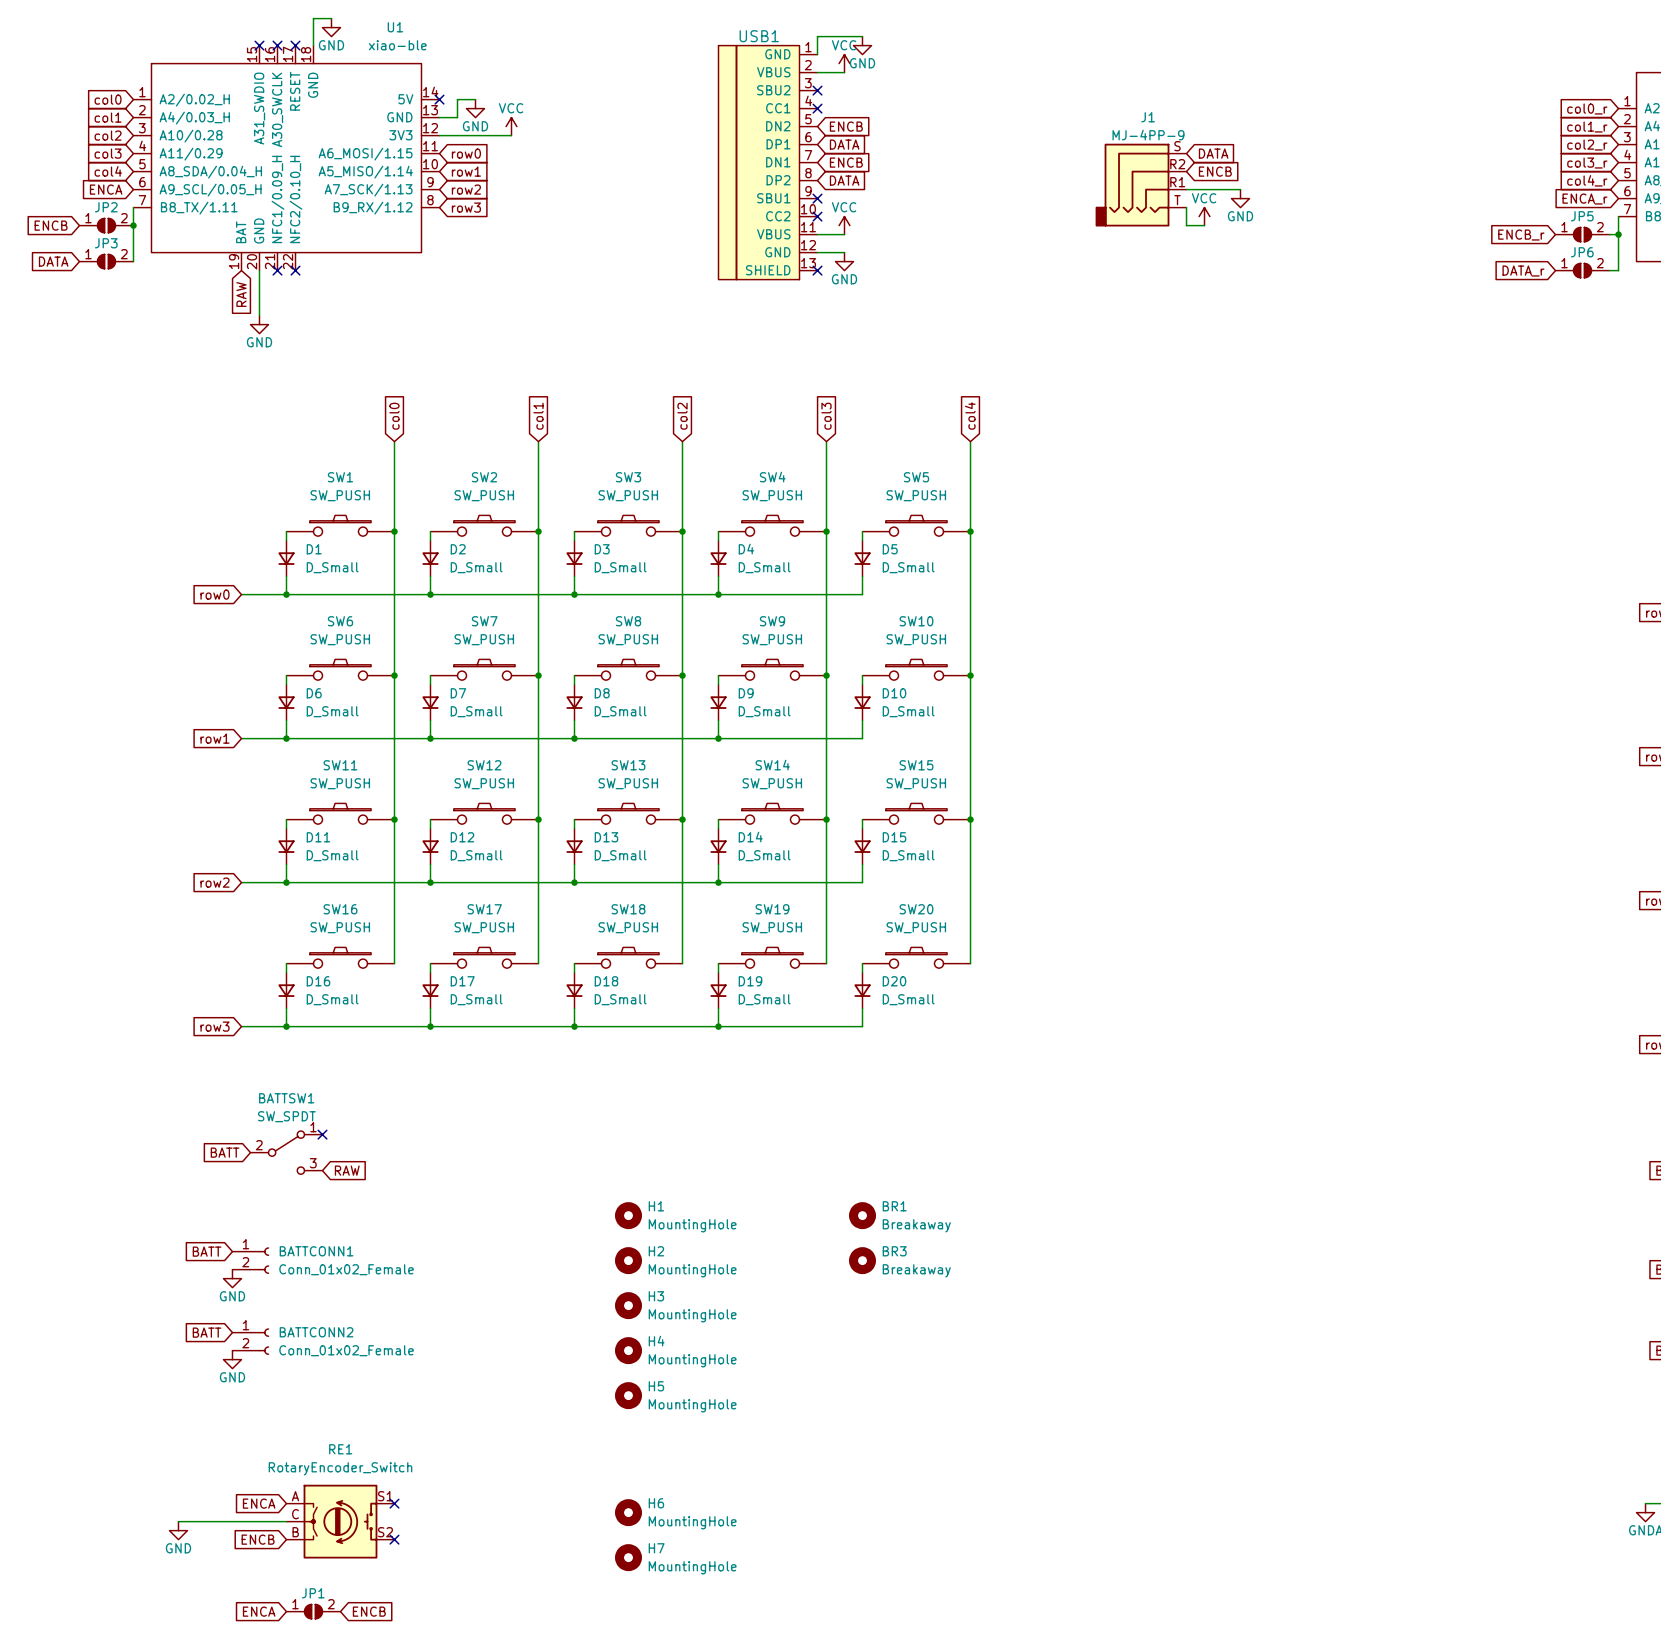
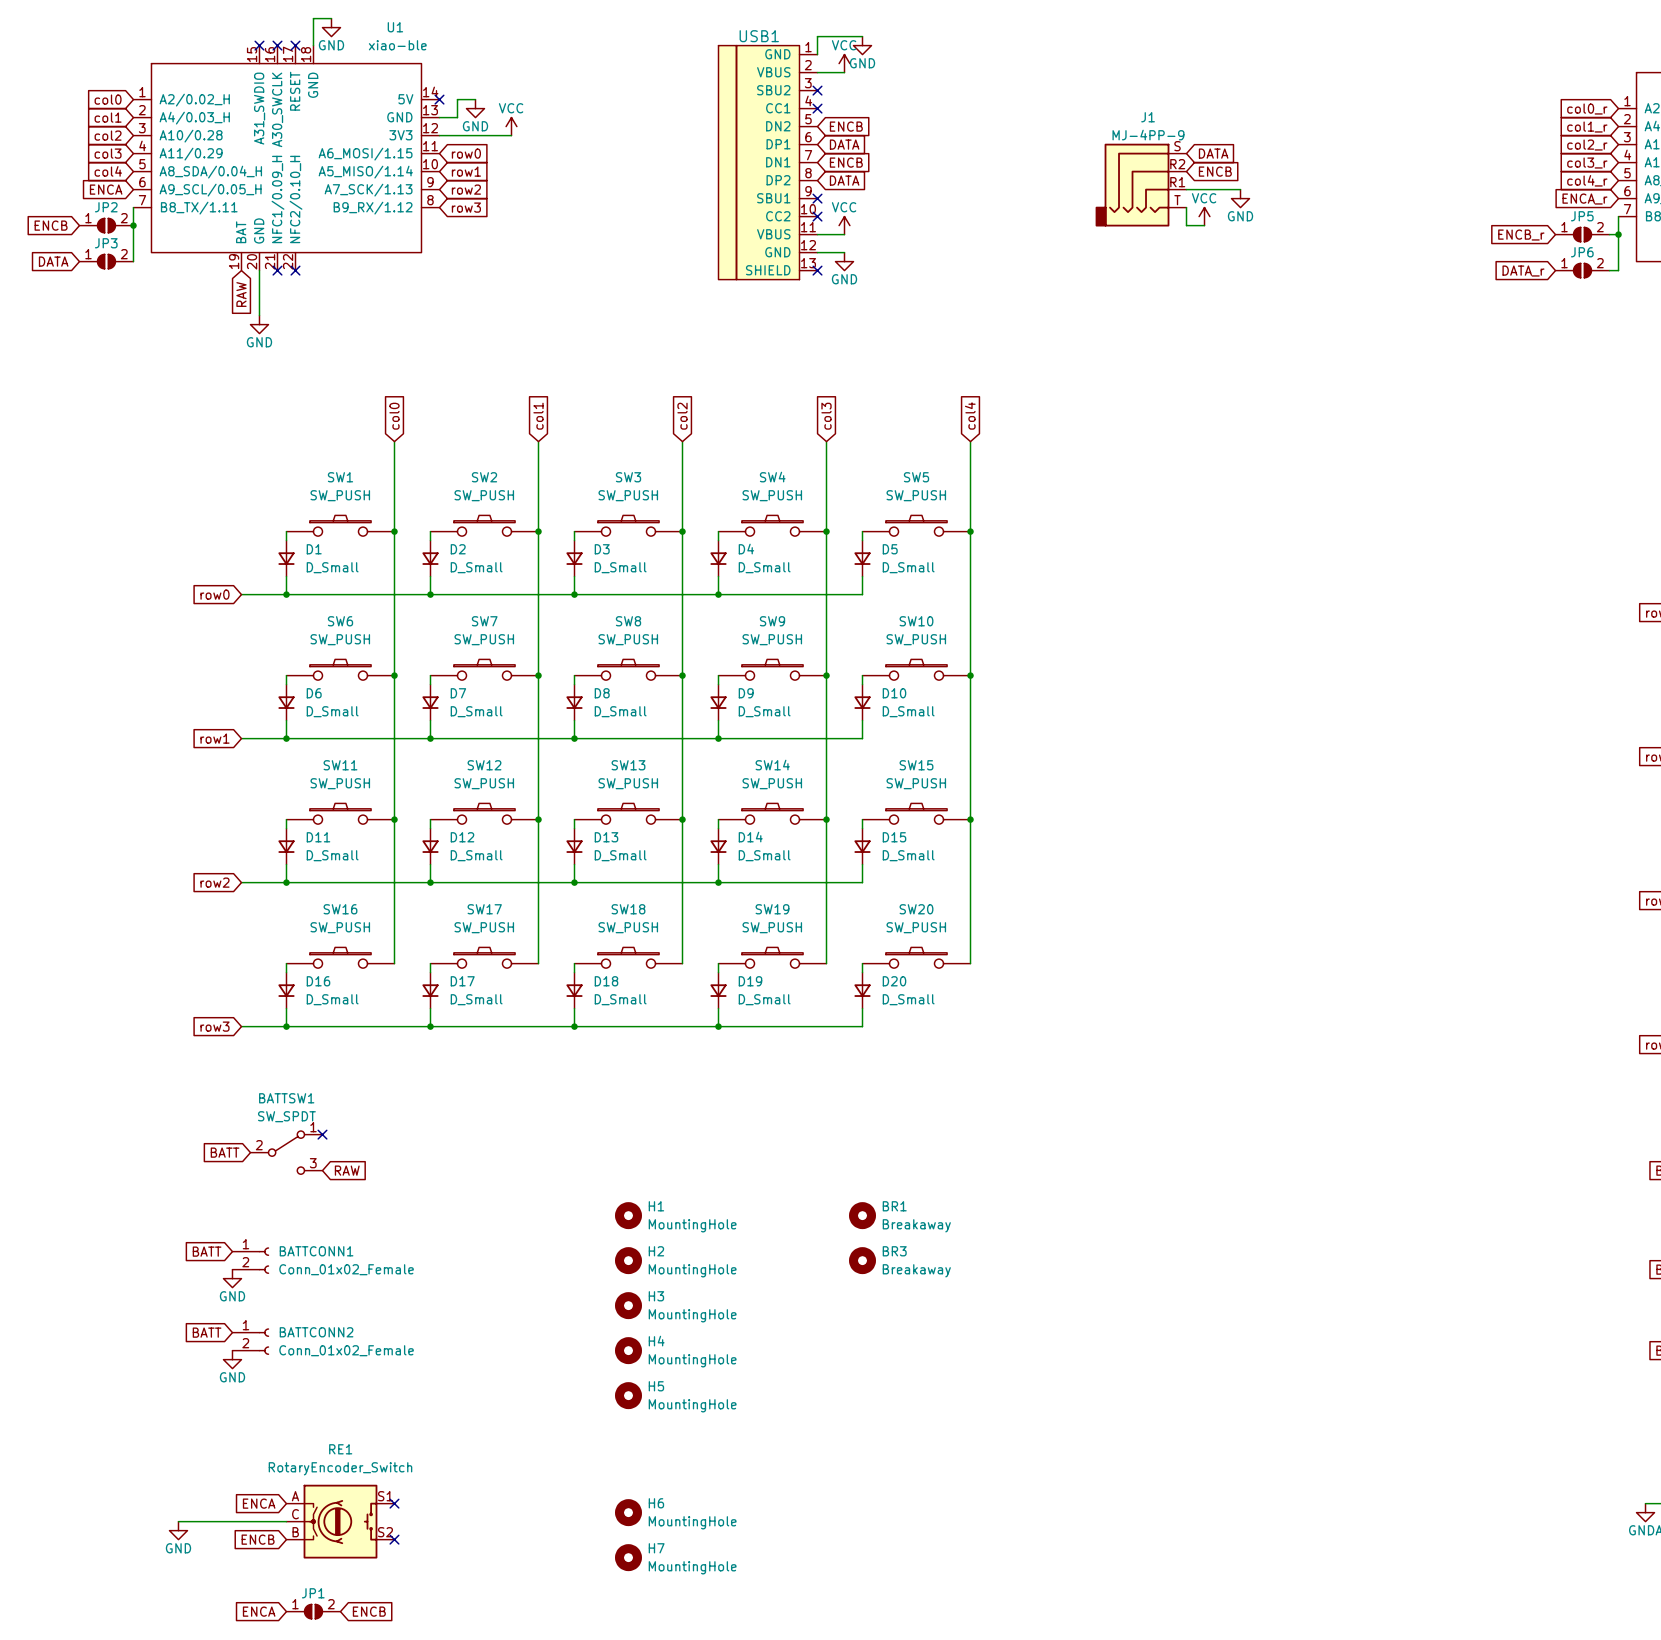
RE1 symbol: [286, 1484, 395, 1559] -> [286, 1484, 395, 1559]

